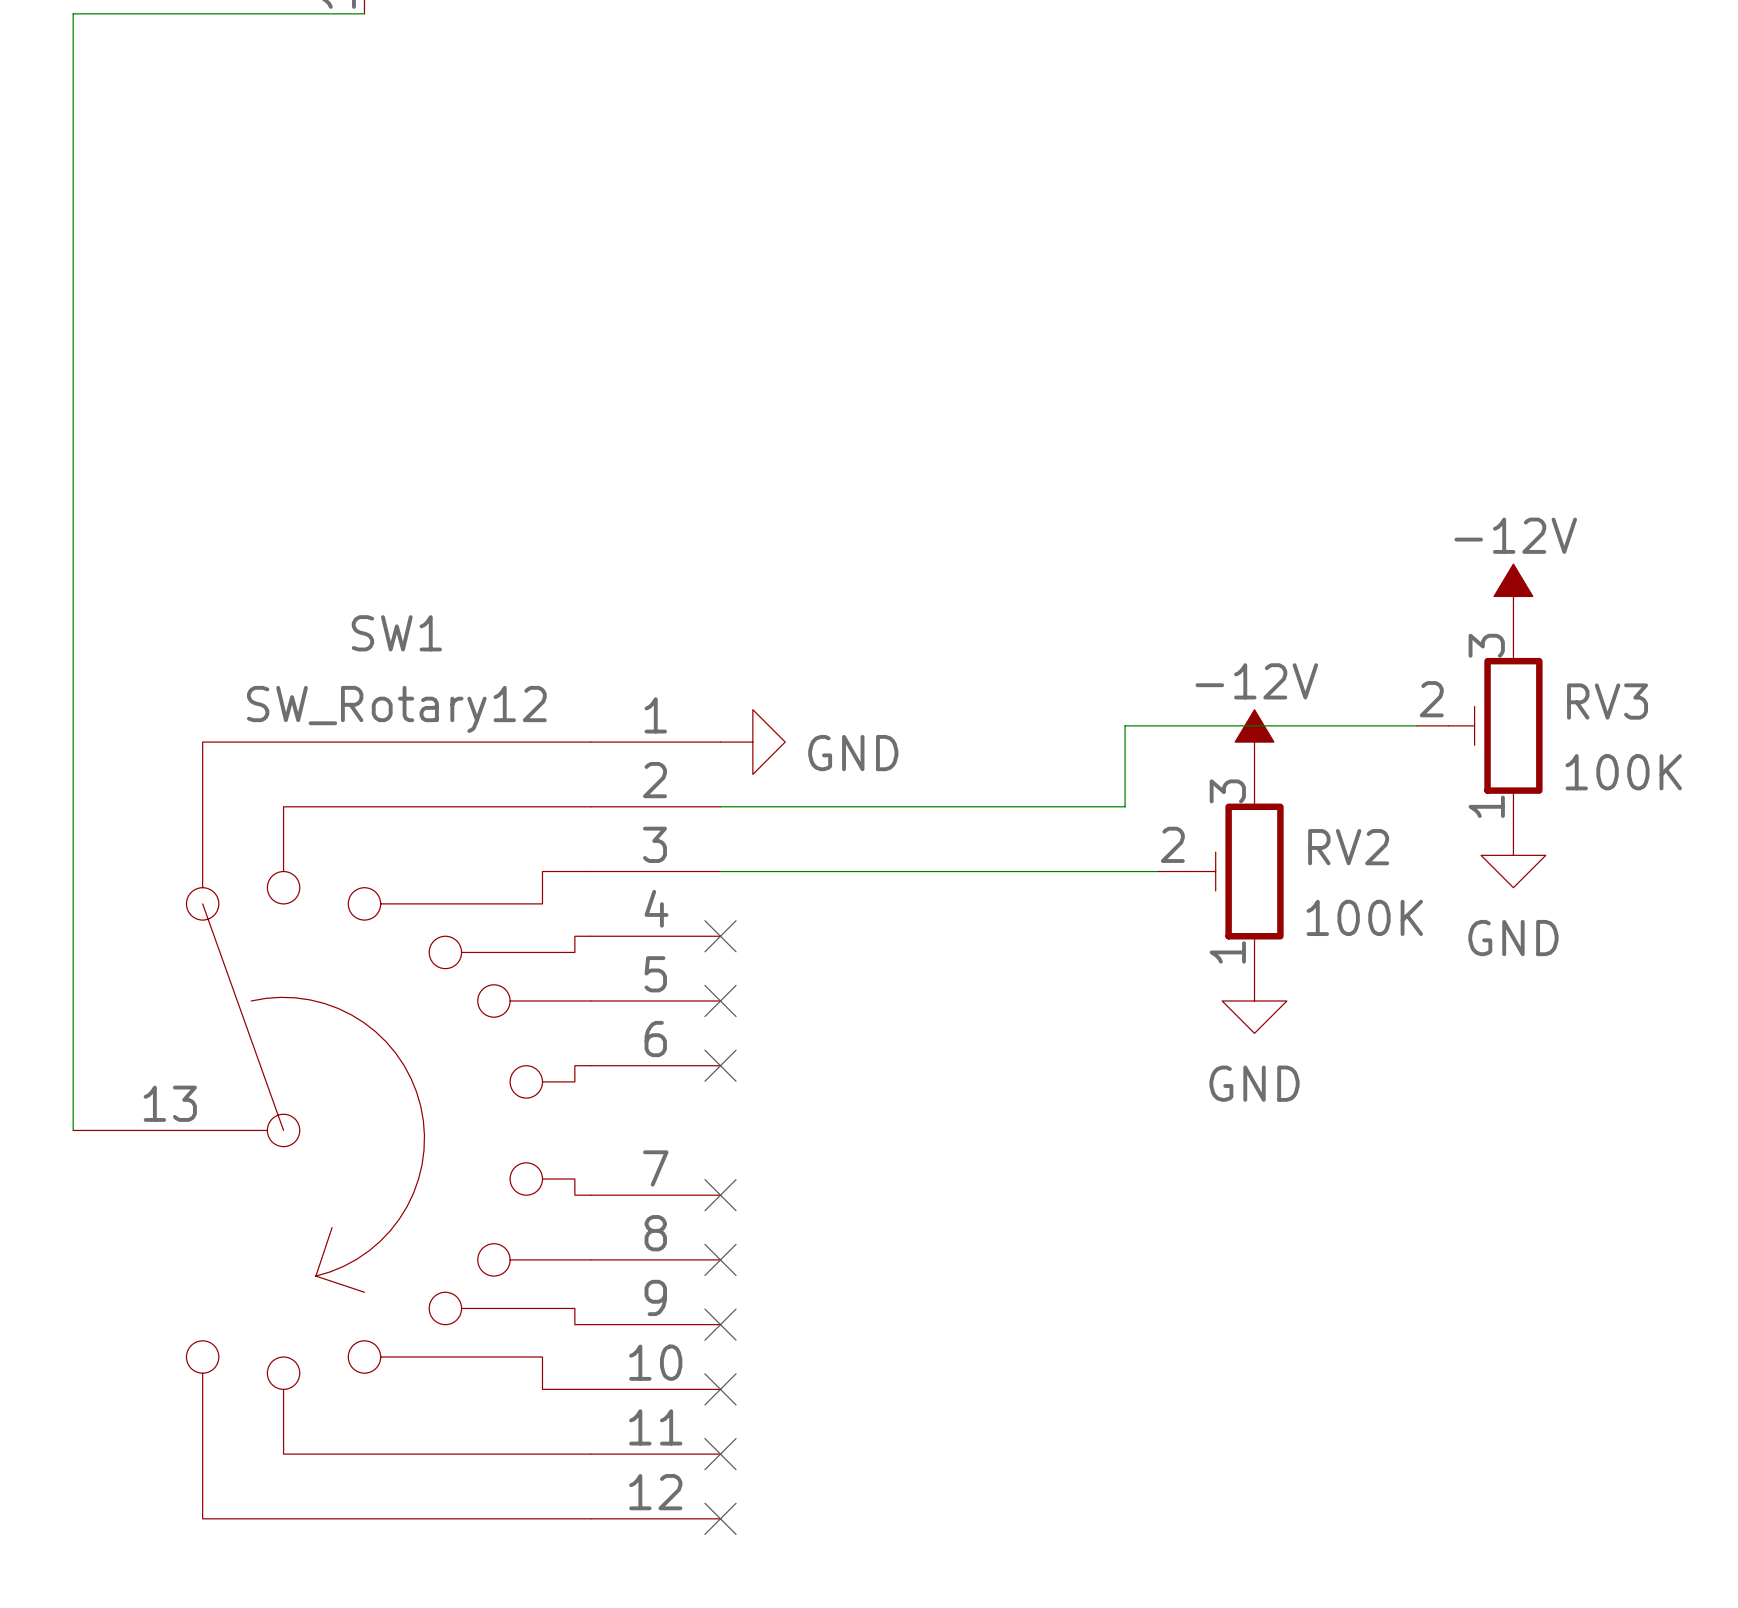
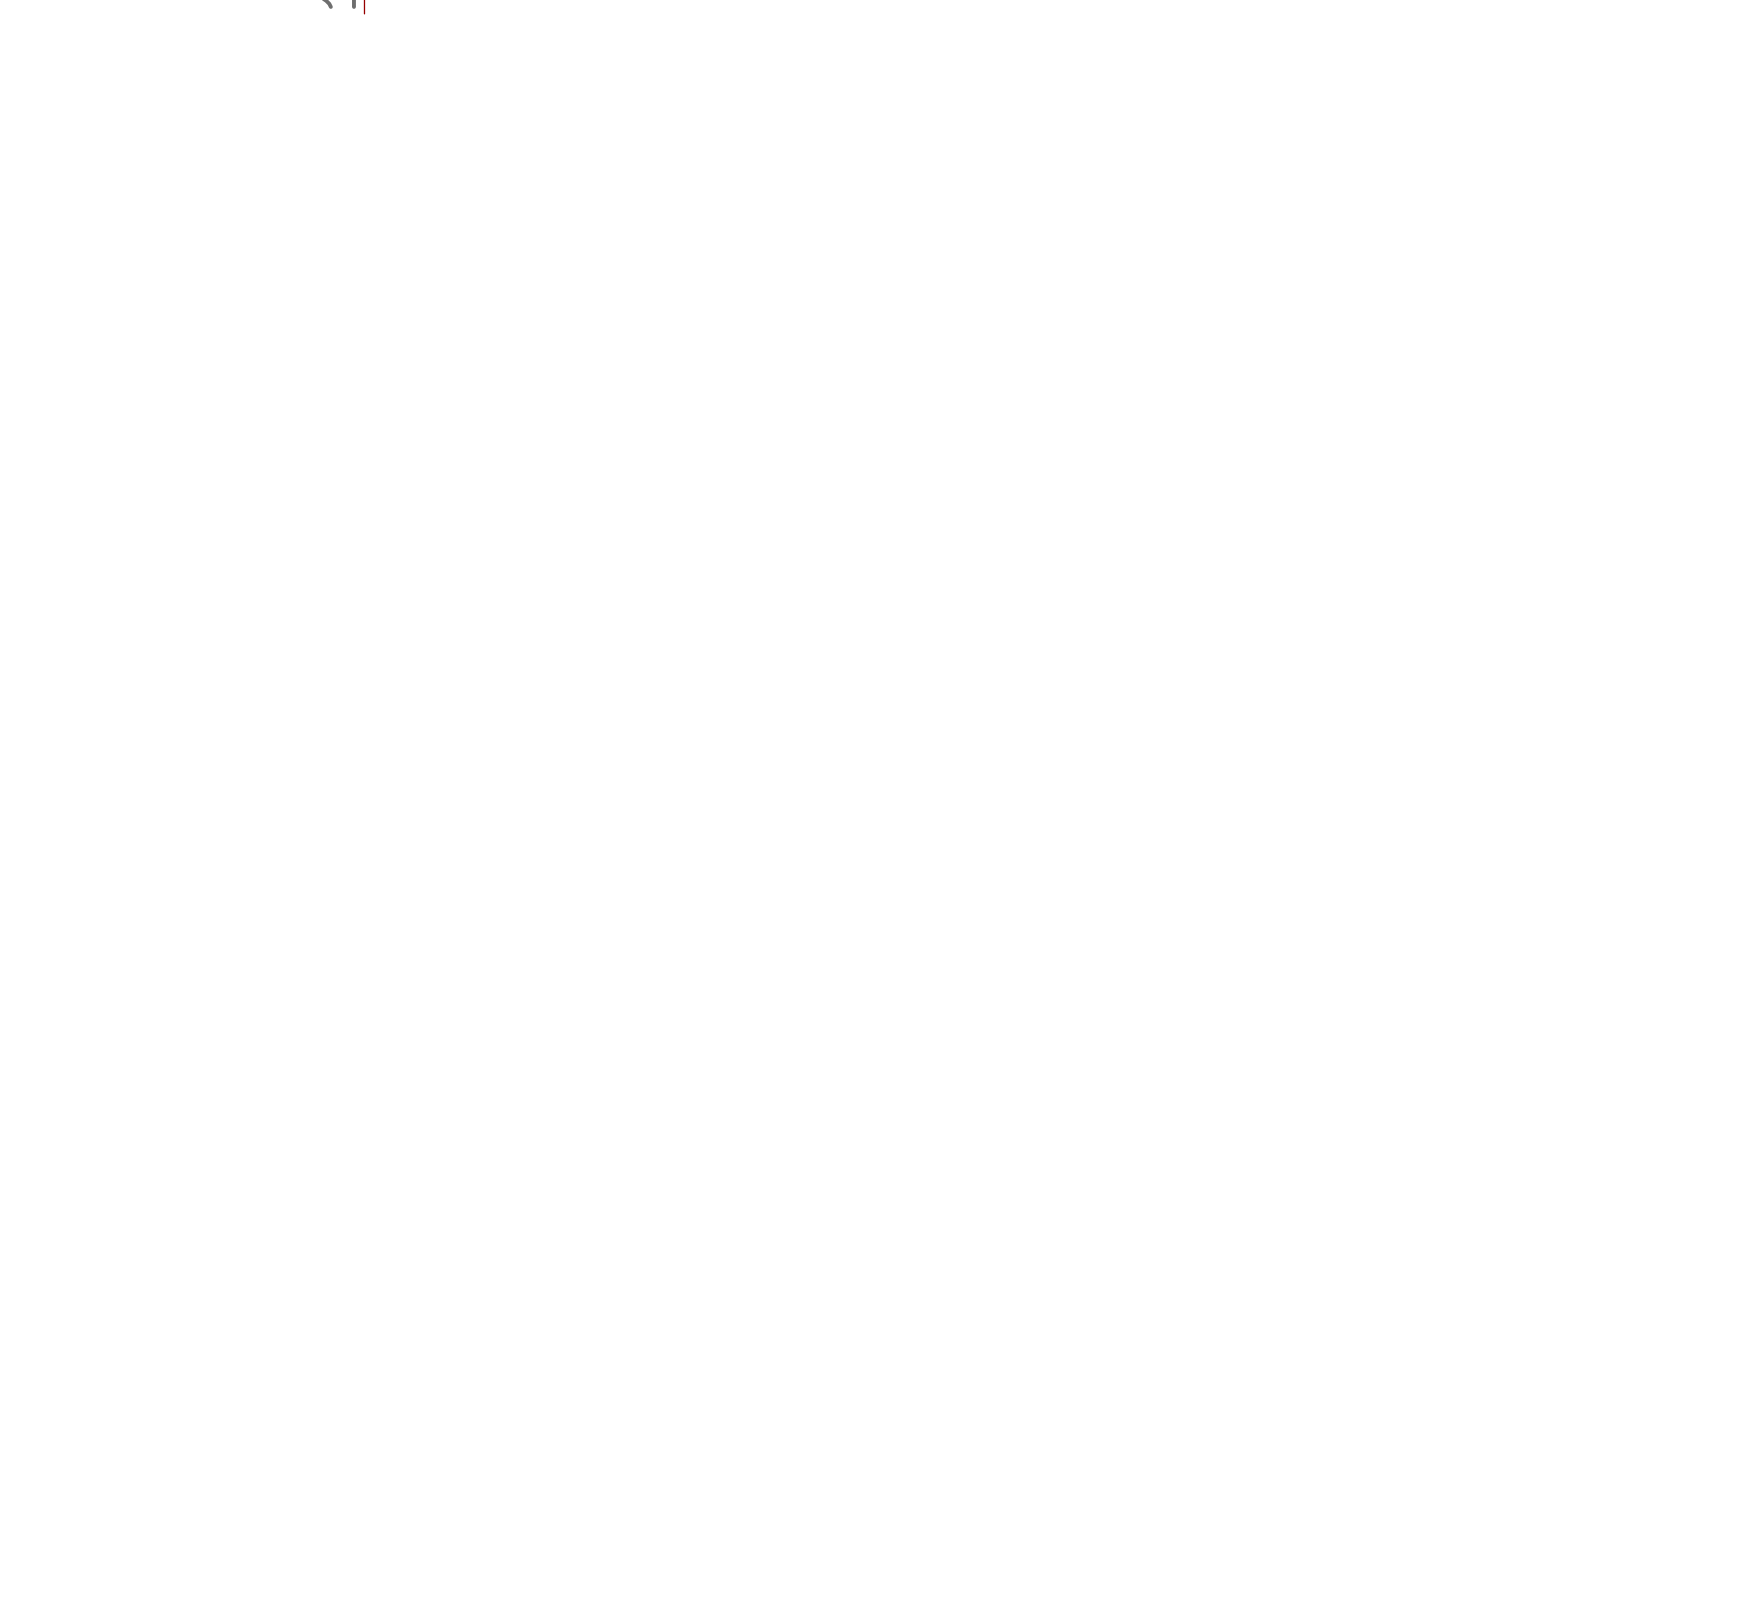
wire: (364, 13) (73, 13) (73, 1130) -> none
power symbol: -12V (1513, 596) -> none
wire: (1416, 725) (1125, 725) (1125, 806) (720, 806) -> none
RV3: 100K (1479, 725) -> none
power symbol: GND (752, 742) -> none
power symbol: -12V (1254, 742) -> none
power symbol: GND (1513, 855) -> none
wire: (720, 871) (1157, 871) -> none
RV2: 100K (1220, 871) -> none
no-connect mark: (720, 936) -> none
no-connect mark: (720, 1000) -> none
power symbol: GND (1254, 1000) -> none
no-connect mark: (720, 1065) -> none
SW1: SW_Rotary12 (396, 1130) -> none
no-connect mark: (720, 1195) -> none
no-connect mark: (720, 1259) -> none
no-connect mark: (720, 1324) -> none
no-connect mark: (720, 1389) -> none
no-connect mark: (720, 1454) -> none
no-connect mark: (720, 1518) -> none

